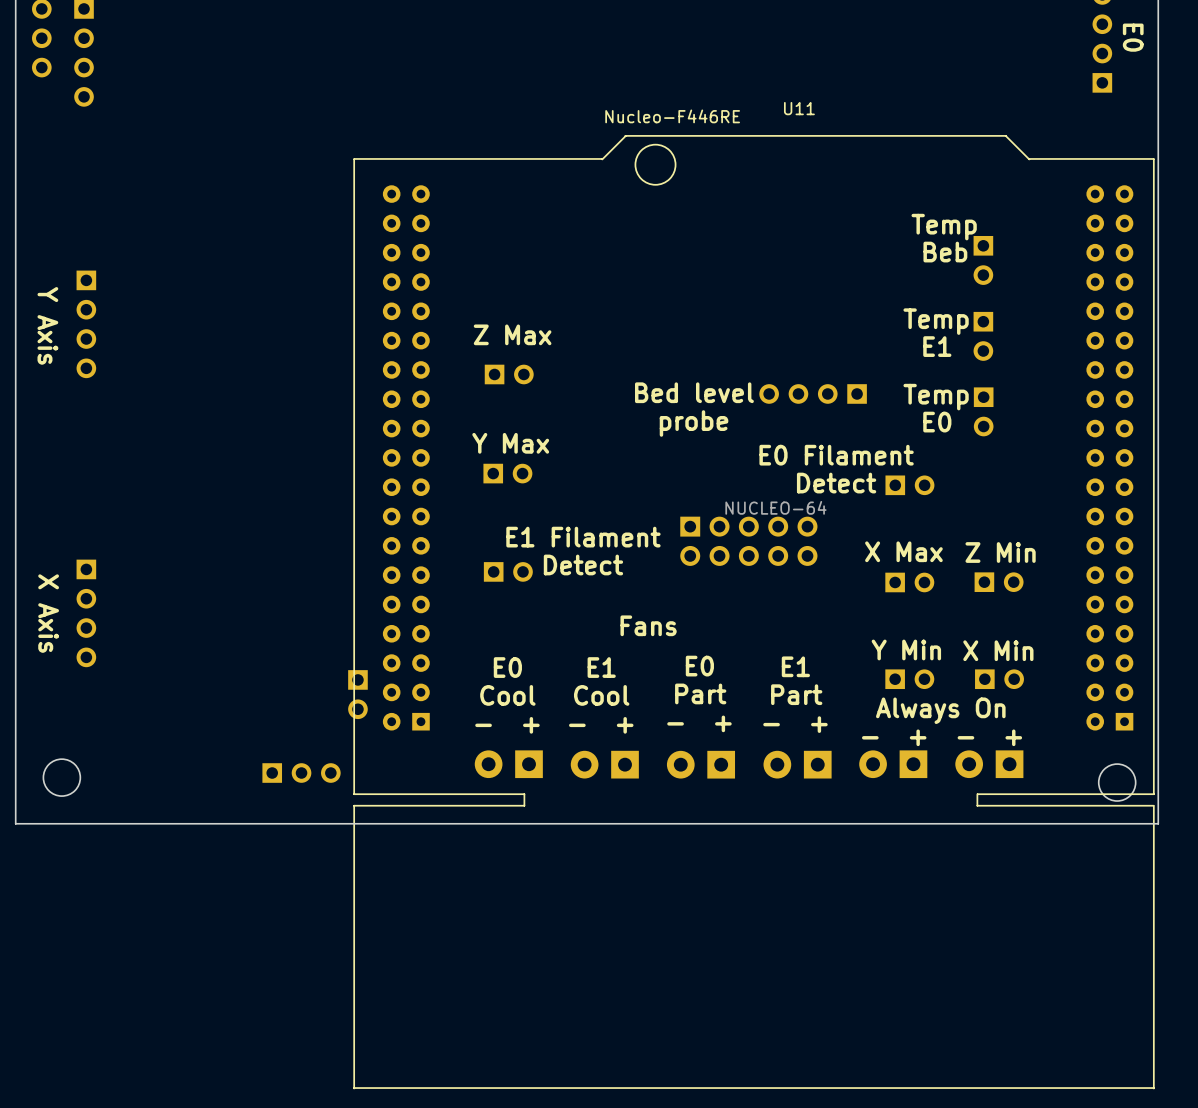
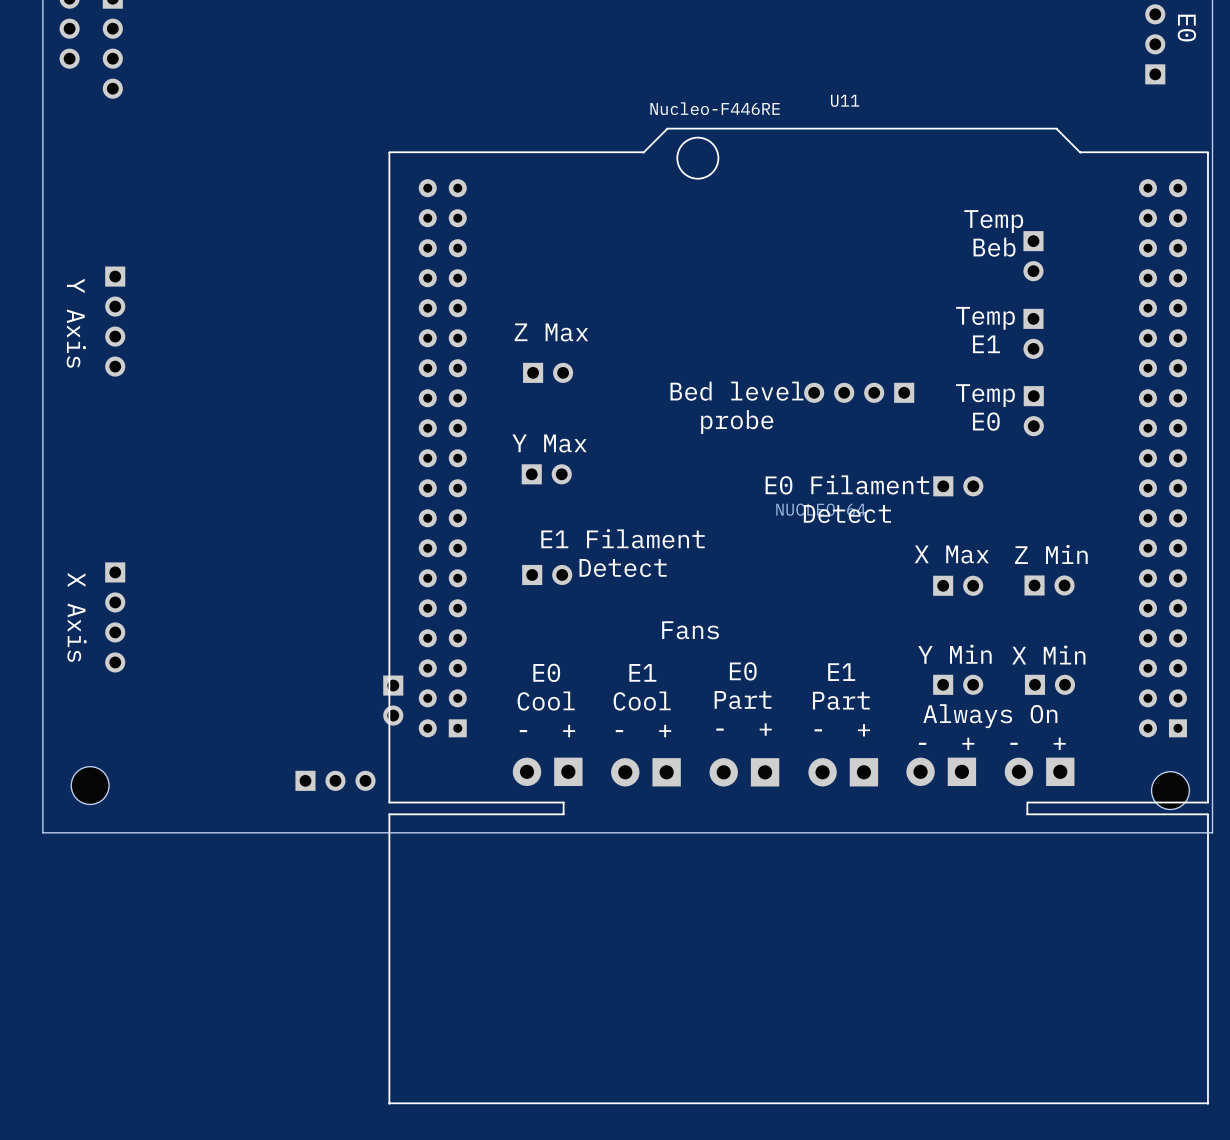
text position: E0 Filament (836, 455) -> E0 Filament (847, 484)
text position: Detect (836, 483) -> Detect (847, 514)
part: (748, 541) -> none

